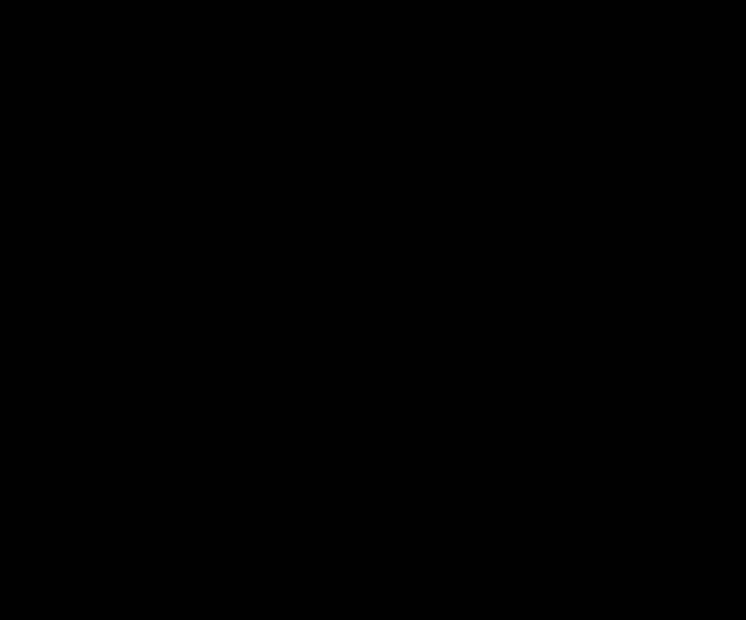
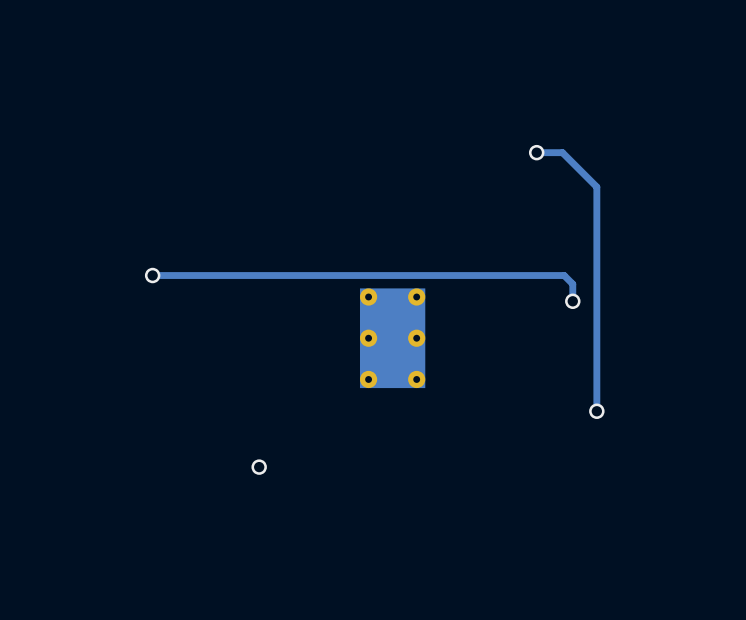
track: none -> (536, 152) (562, 152) (596, 187) (596, 411)
via: none -> (536, 152)
track: none -> (152, 275) (564, 275) (572, 284) (572, 301)
via: none -> (152, 275)
via: none -> (572, 301)
part: none -> (392, 338)
via: none -> (596, 411)
via: none -> (259, 467)

